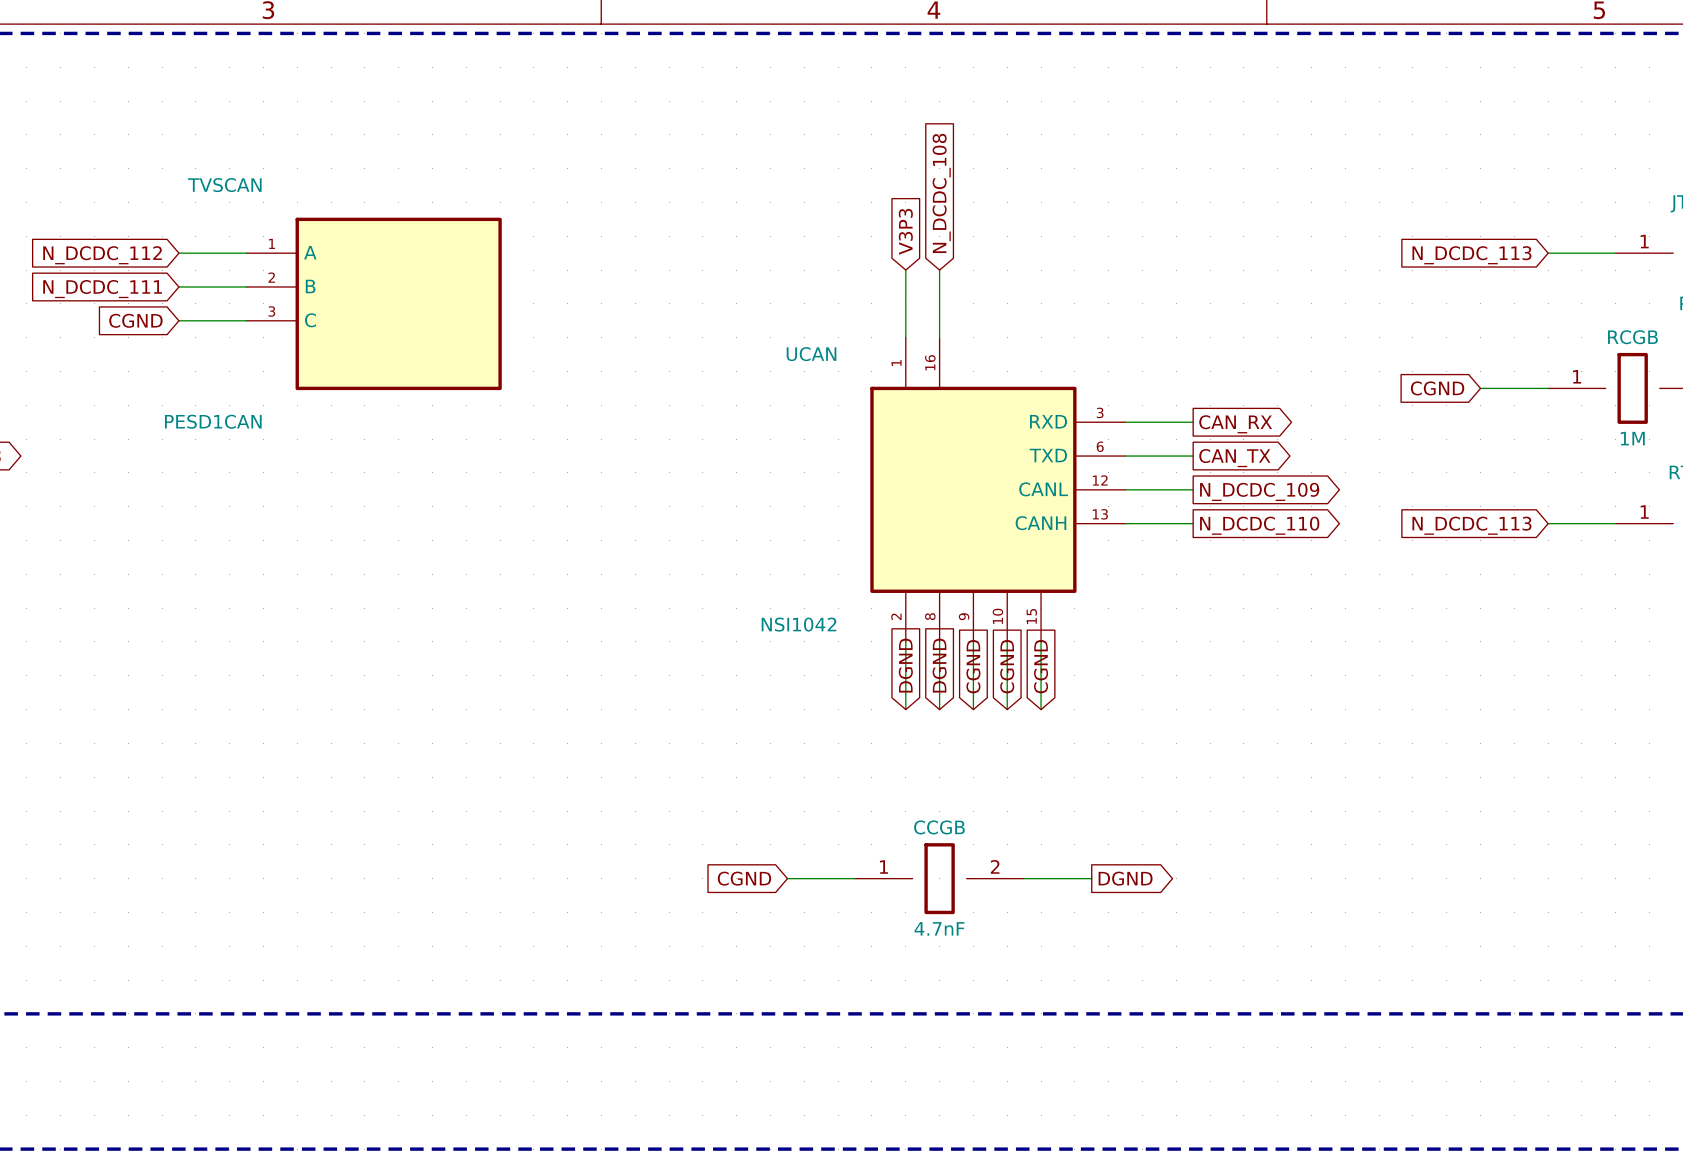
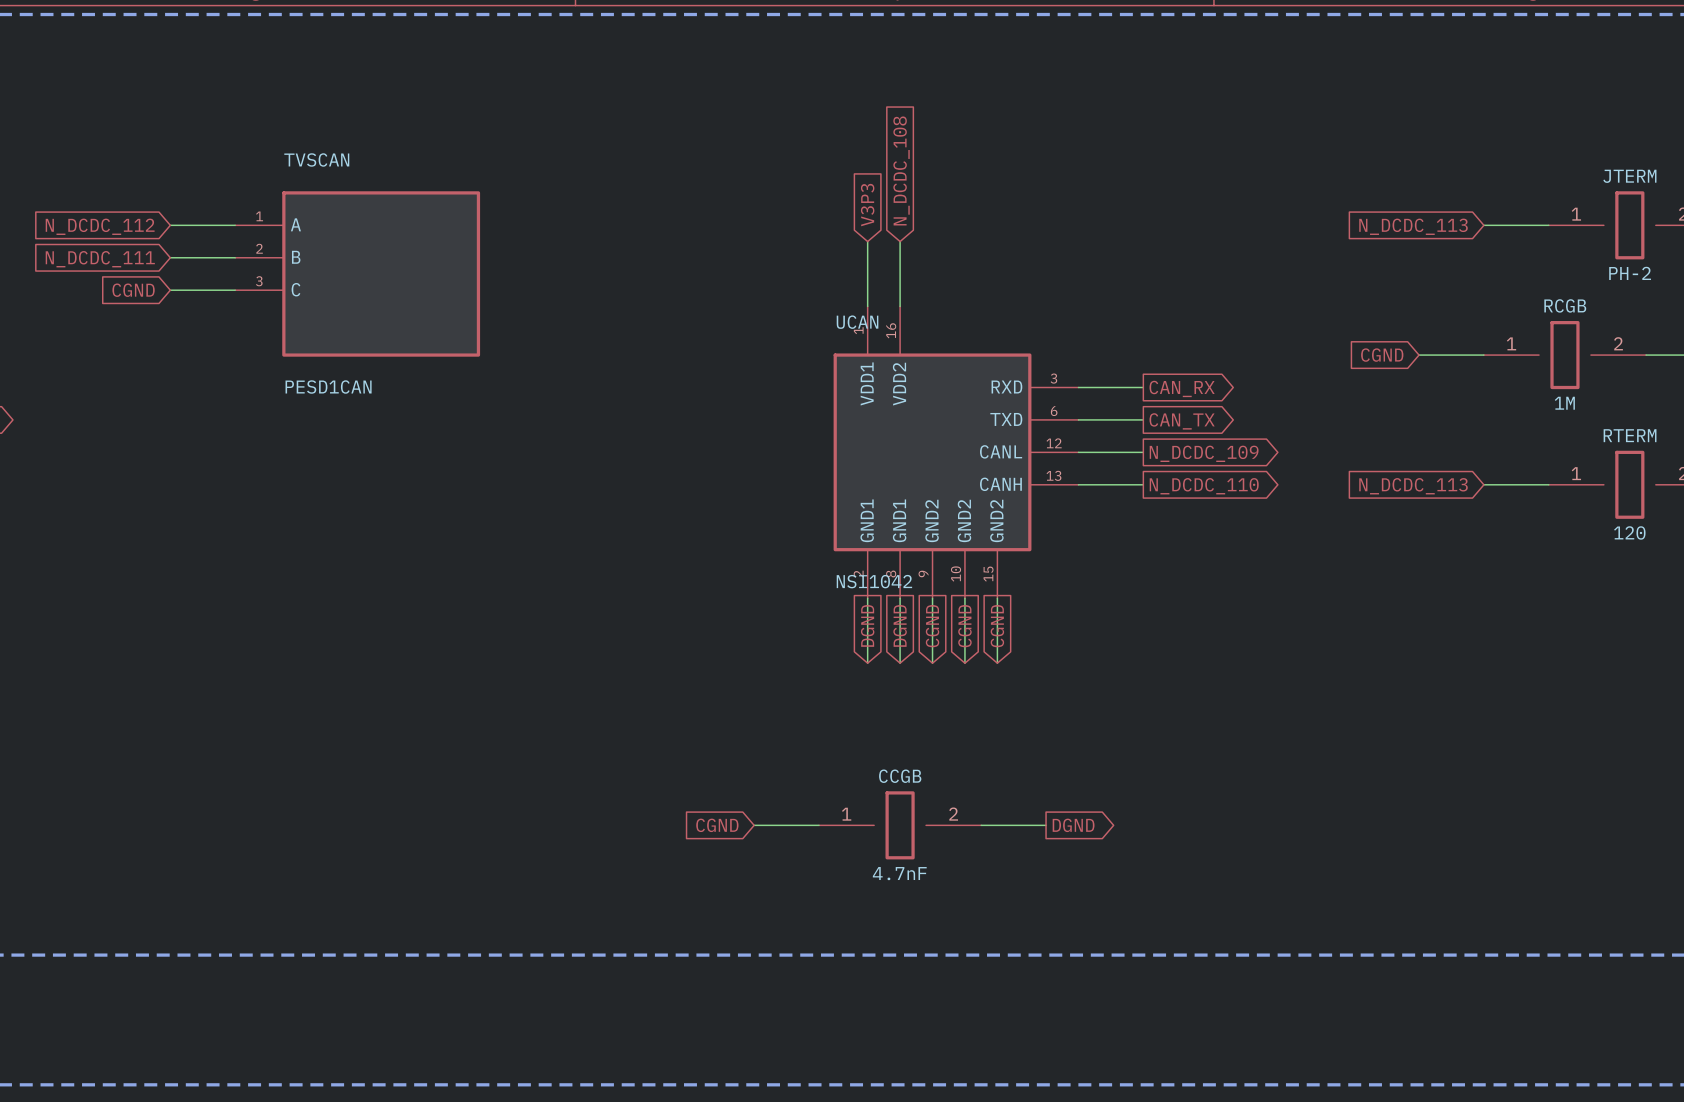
TVSCAN name position: TVSCAN (224, 185) -> TVSCAN (316, 159)
UCAN name position: UCAN (811, 354) -> UCAN (857, 322)
TVSCAN value position: PESD1CAN (213, 421) -> PESD1CAN (328, 387)
UCAN pin name: none -> VDD1 (867, 383)
UCAN pin name: none -> VDD2 (899, 384)
UCAN pin name: none -> GND1 (867, 520)
UCAN pin name: none -> GND1 (899, 520)
UCAN pin name: none -> GND2 (932, 520)
UCAN pin name: none -> GND2 (964, 520)
UCAN pin name: none -> GND2 (996, 520)
UCAN value position: NSI1042 (799, 624) -> NSI1042 (874, 581)

